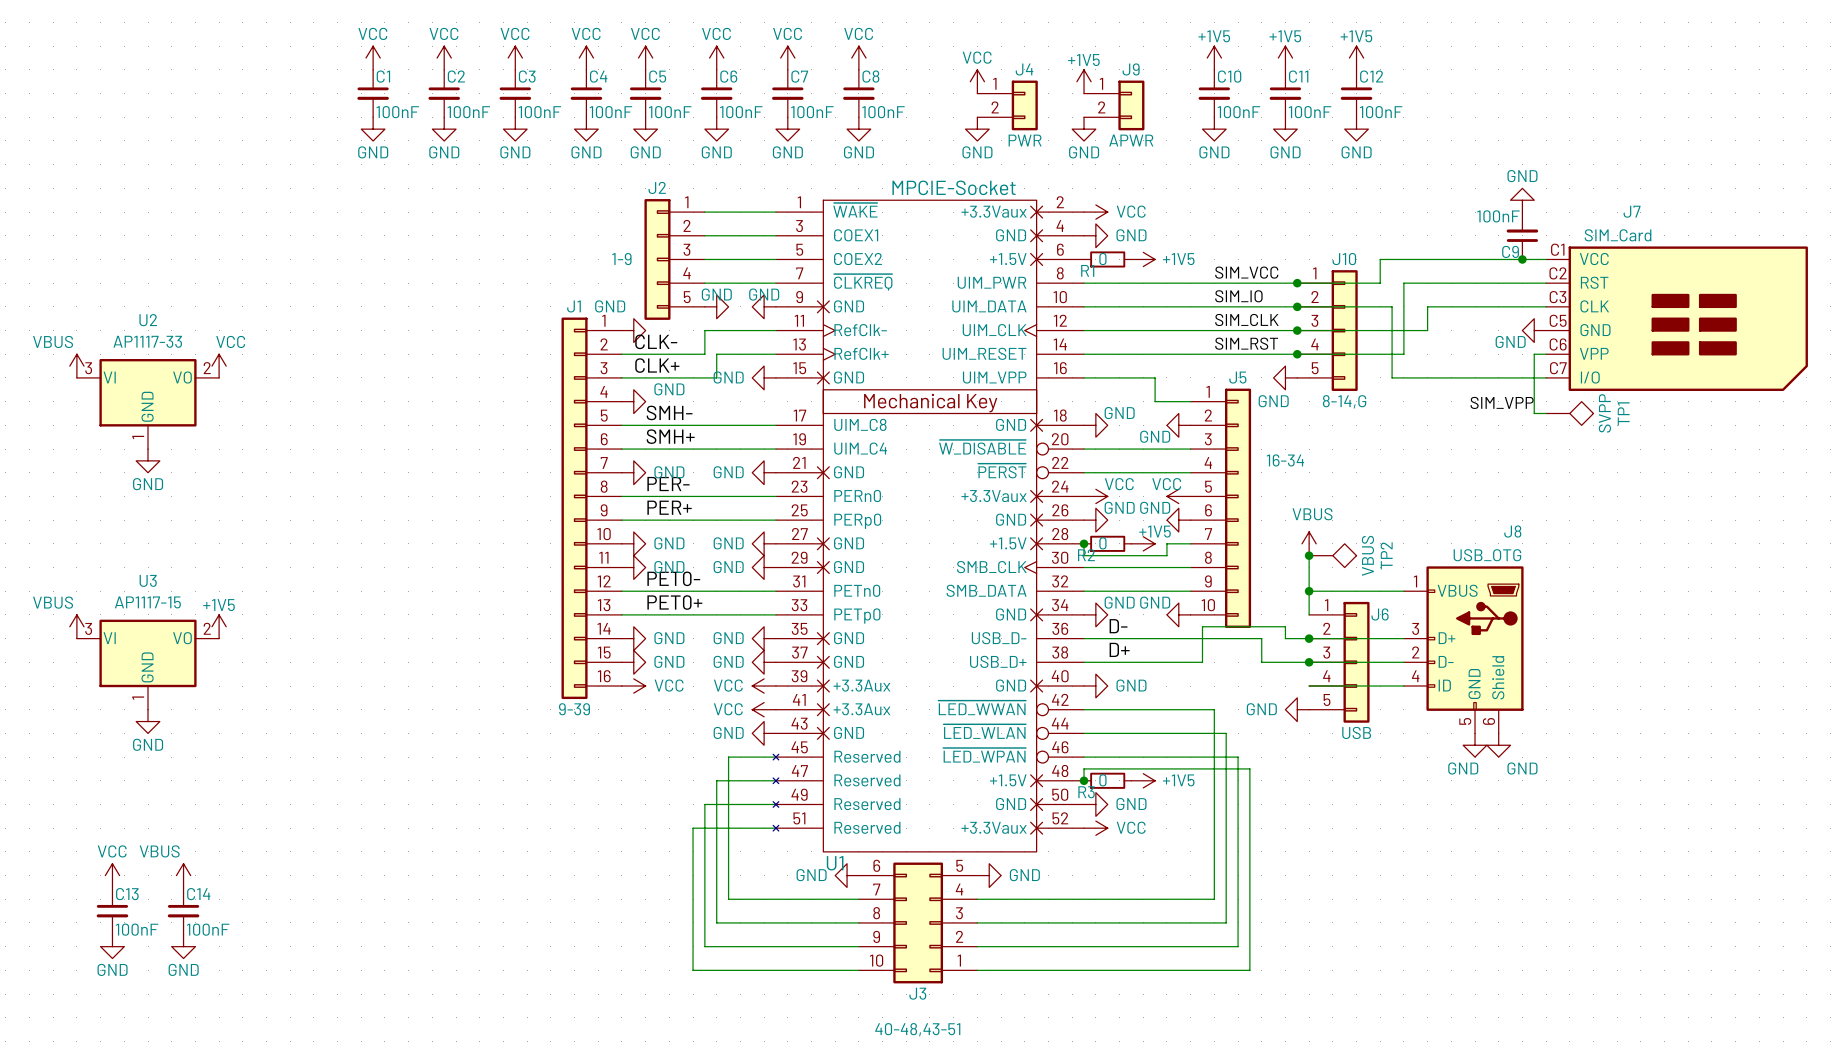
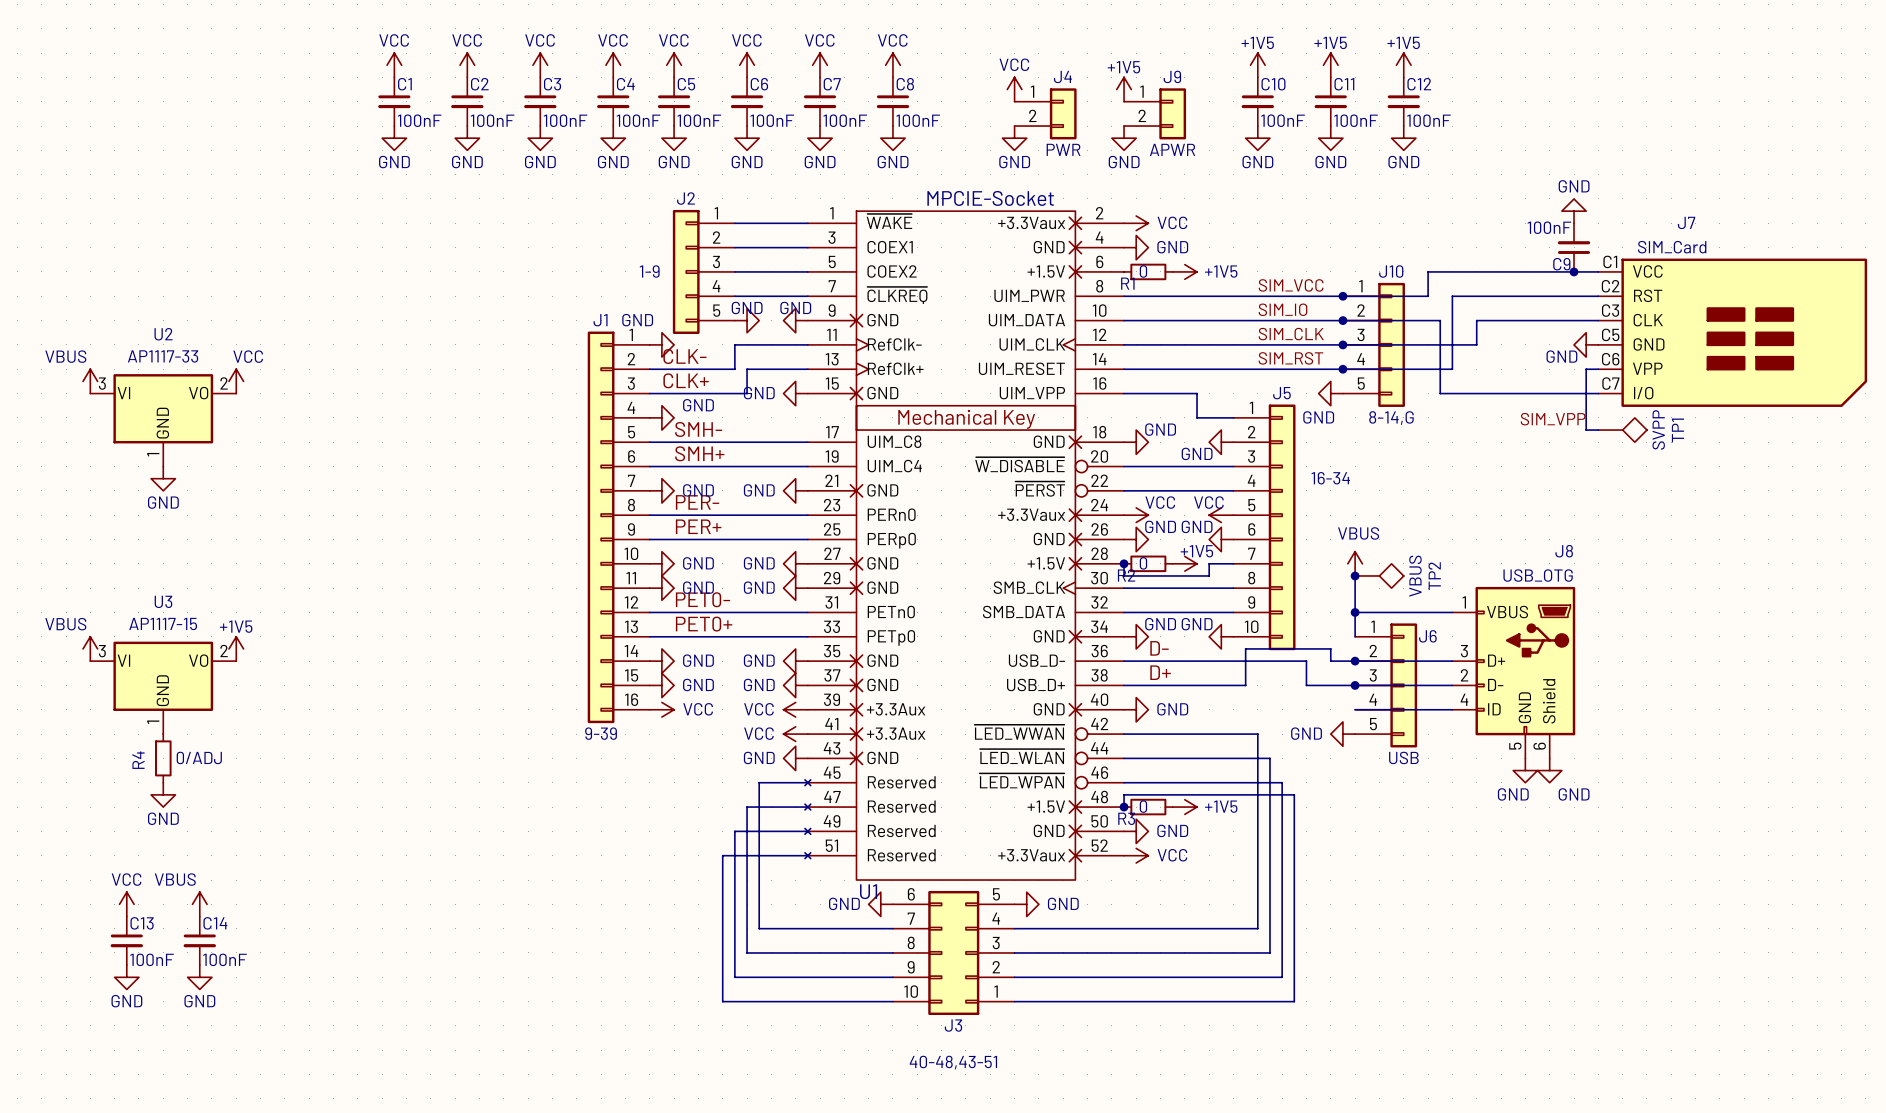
power symbol position: GND (148, 721) -> GND (163, 794)
R4: none -> 0/ADJ (163, 758)

